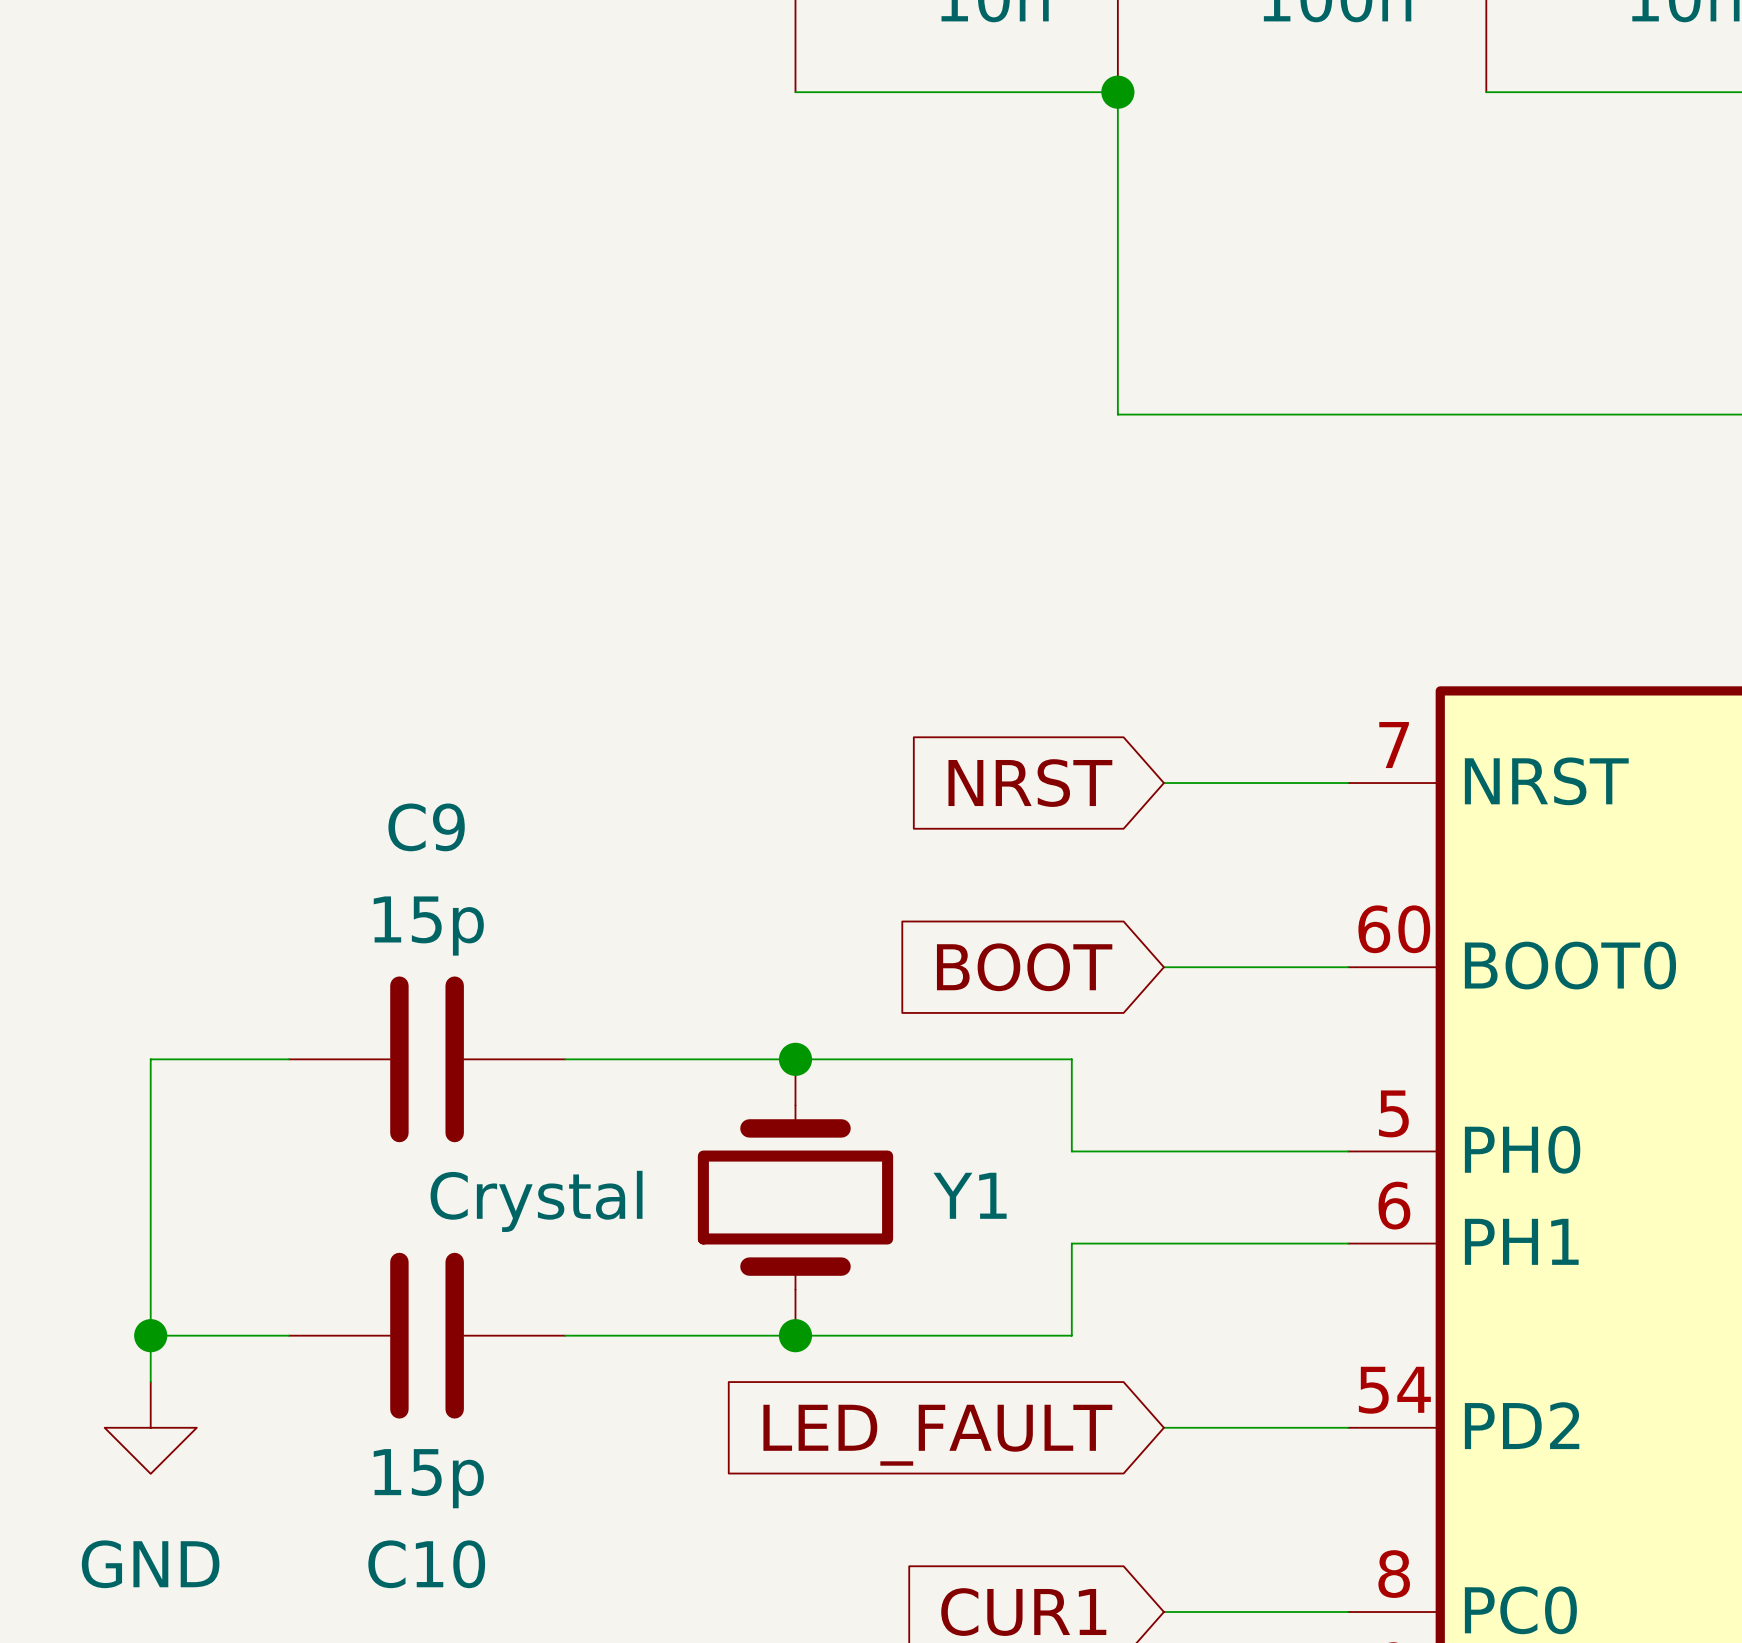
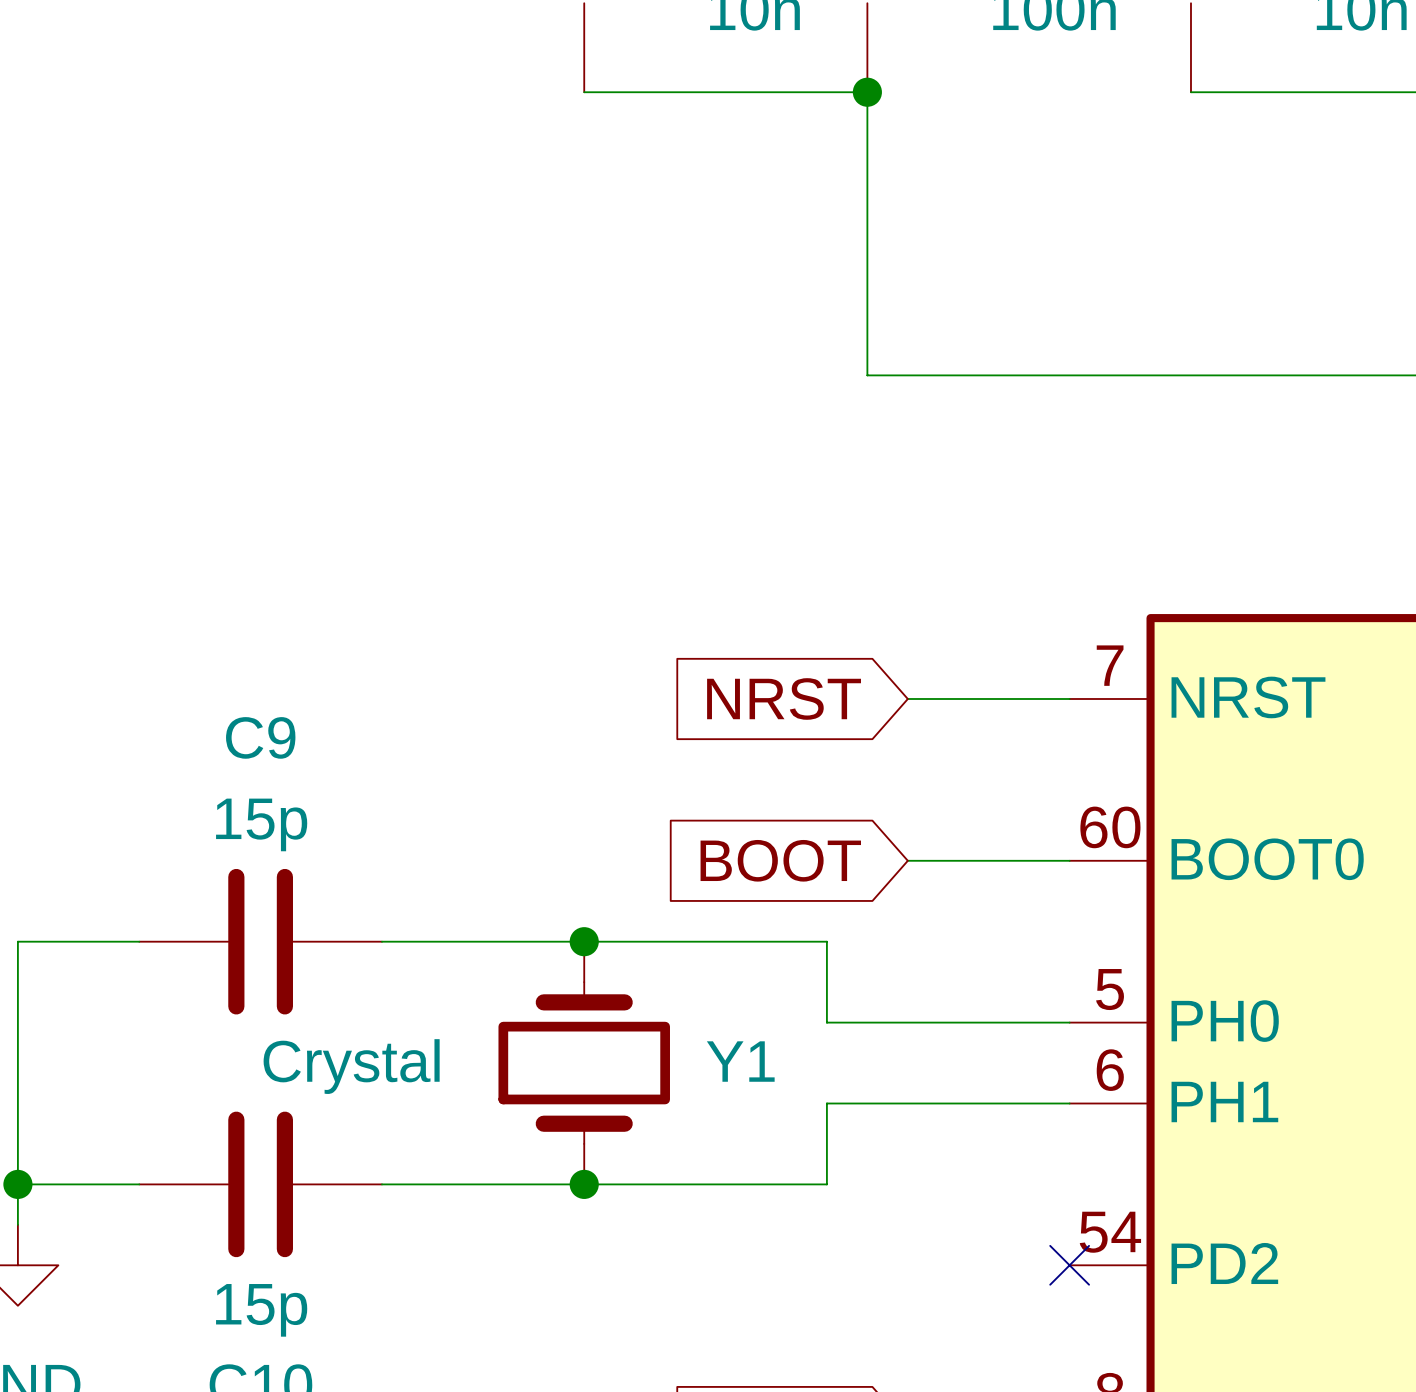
wire: (1163, 1427) (1348, 1427) -> none
no-connect mark: none -> (1069, 1265)
global label: LED_FAULT (937, 1435) -> none

